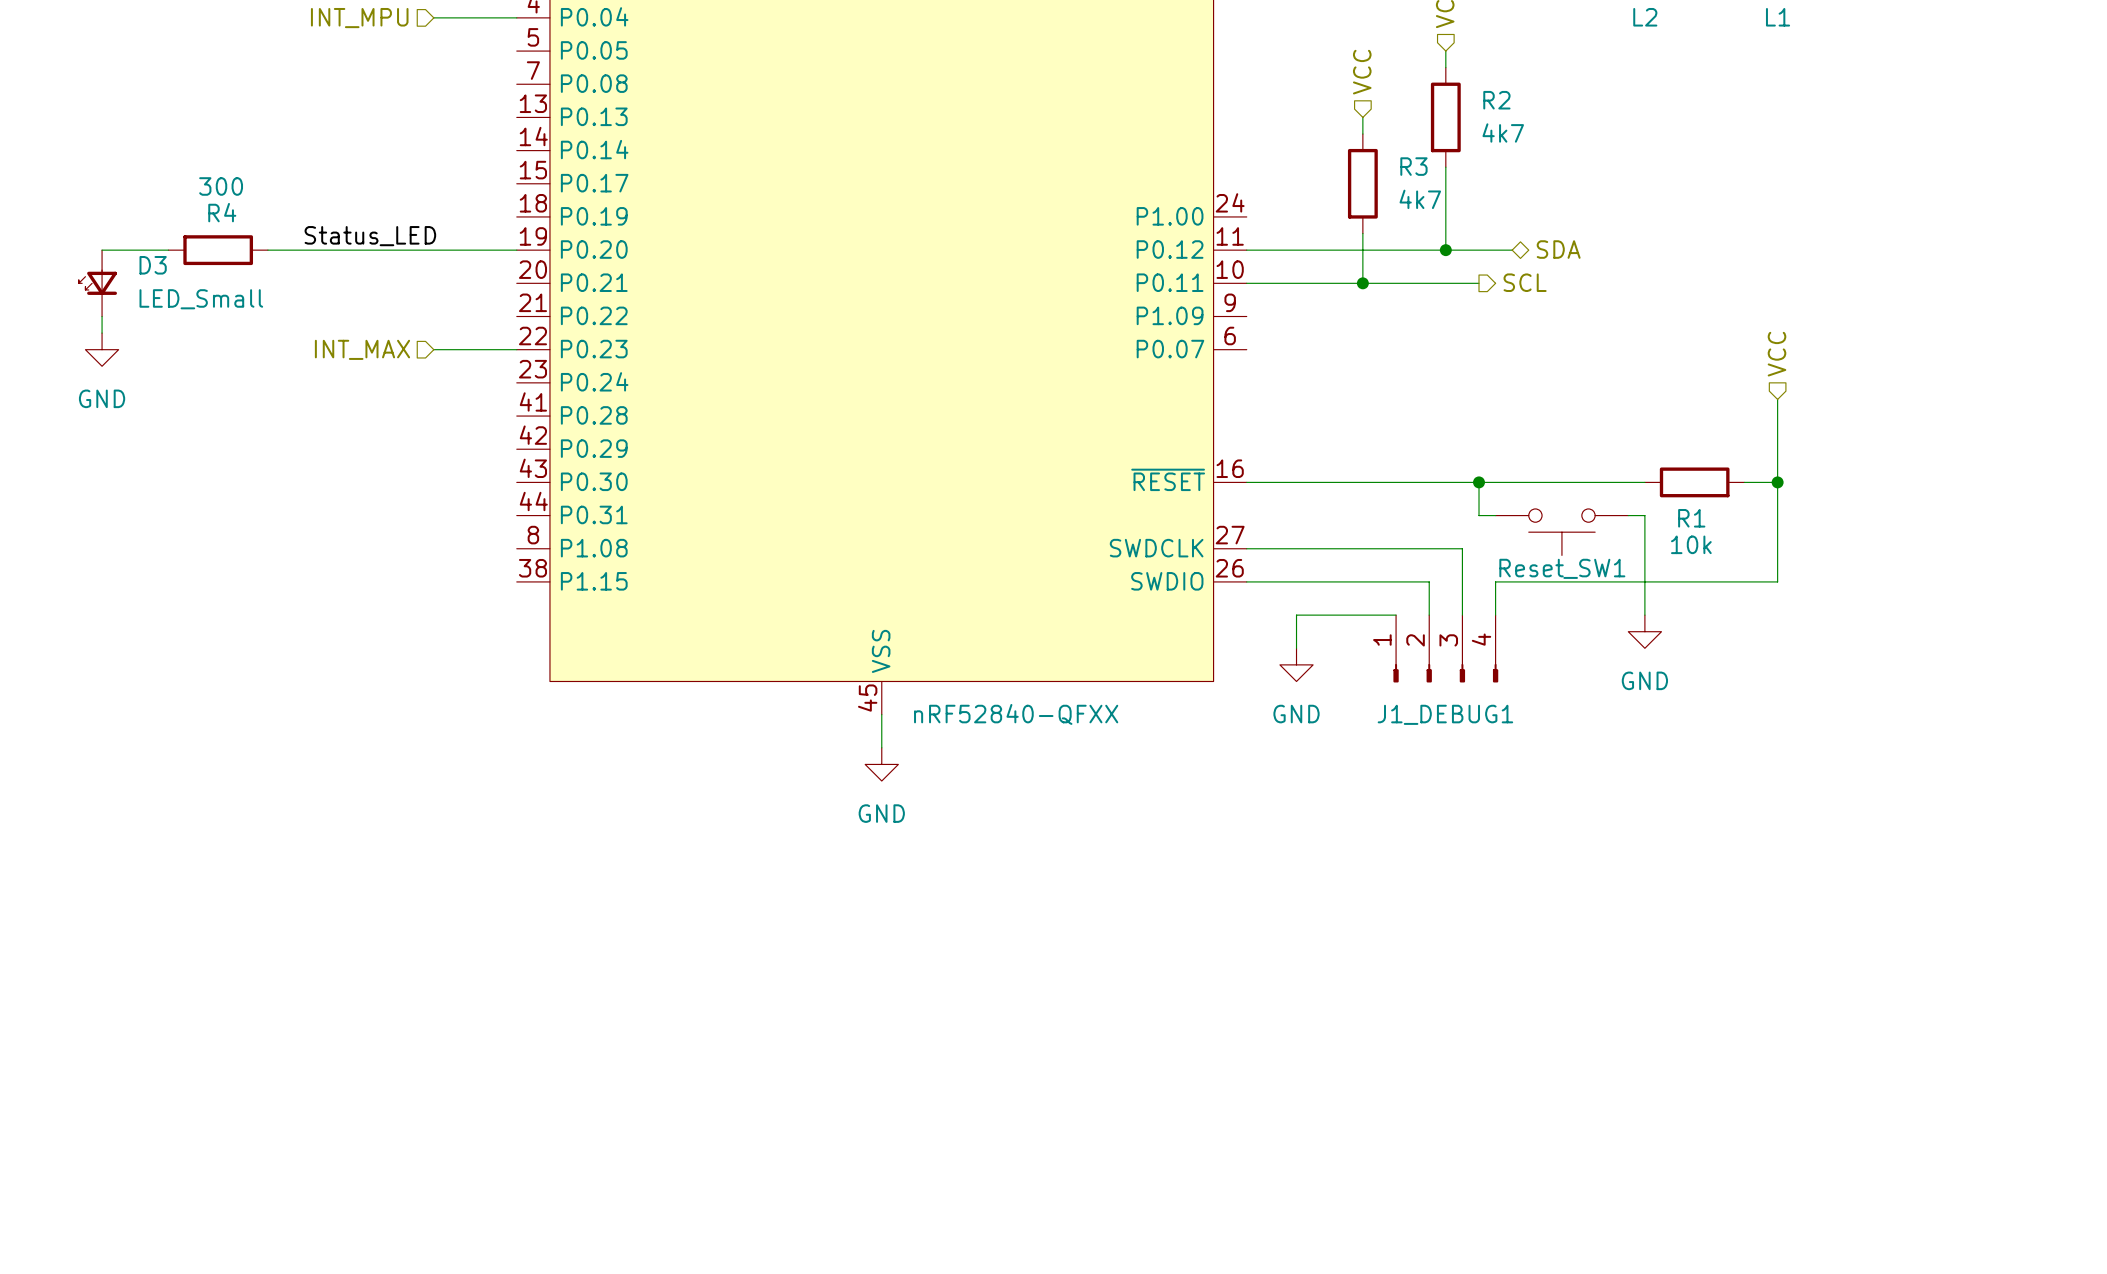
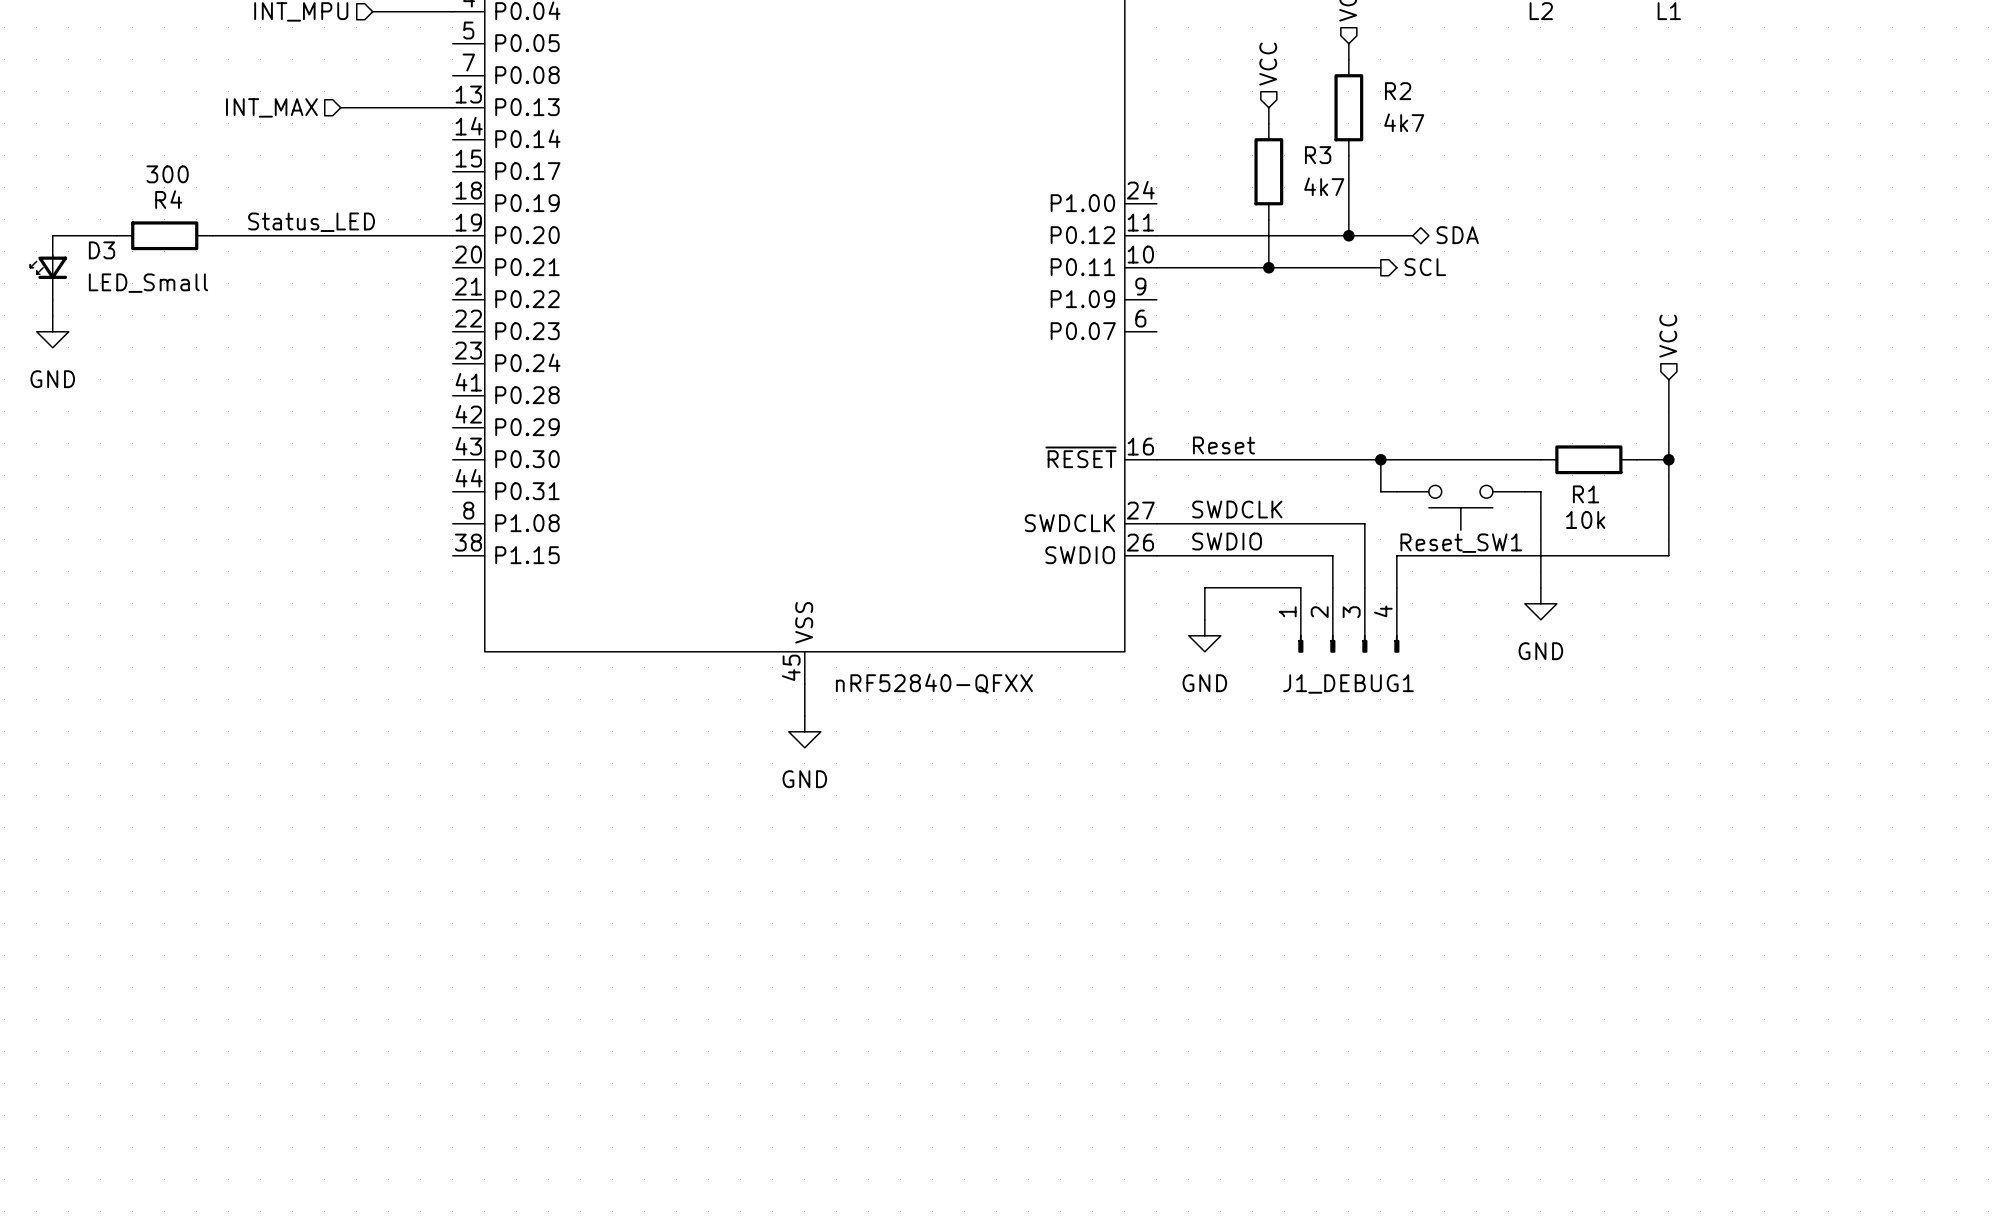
wire: none -> (340, 107) (452, 107)
hierarchical label position: INT_MAX (362, 349) -> INT_MAX (271, 107)
wire: (433, 349) (516, 349) -> none
label: none -> Reset (1224, 445)
label: none -> SWDCLK (1237, 509)
label: none -> SWDIO (1227, 541)

